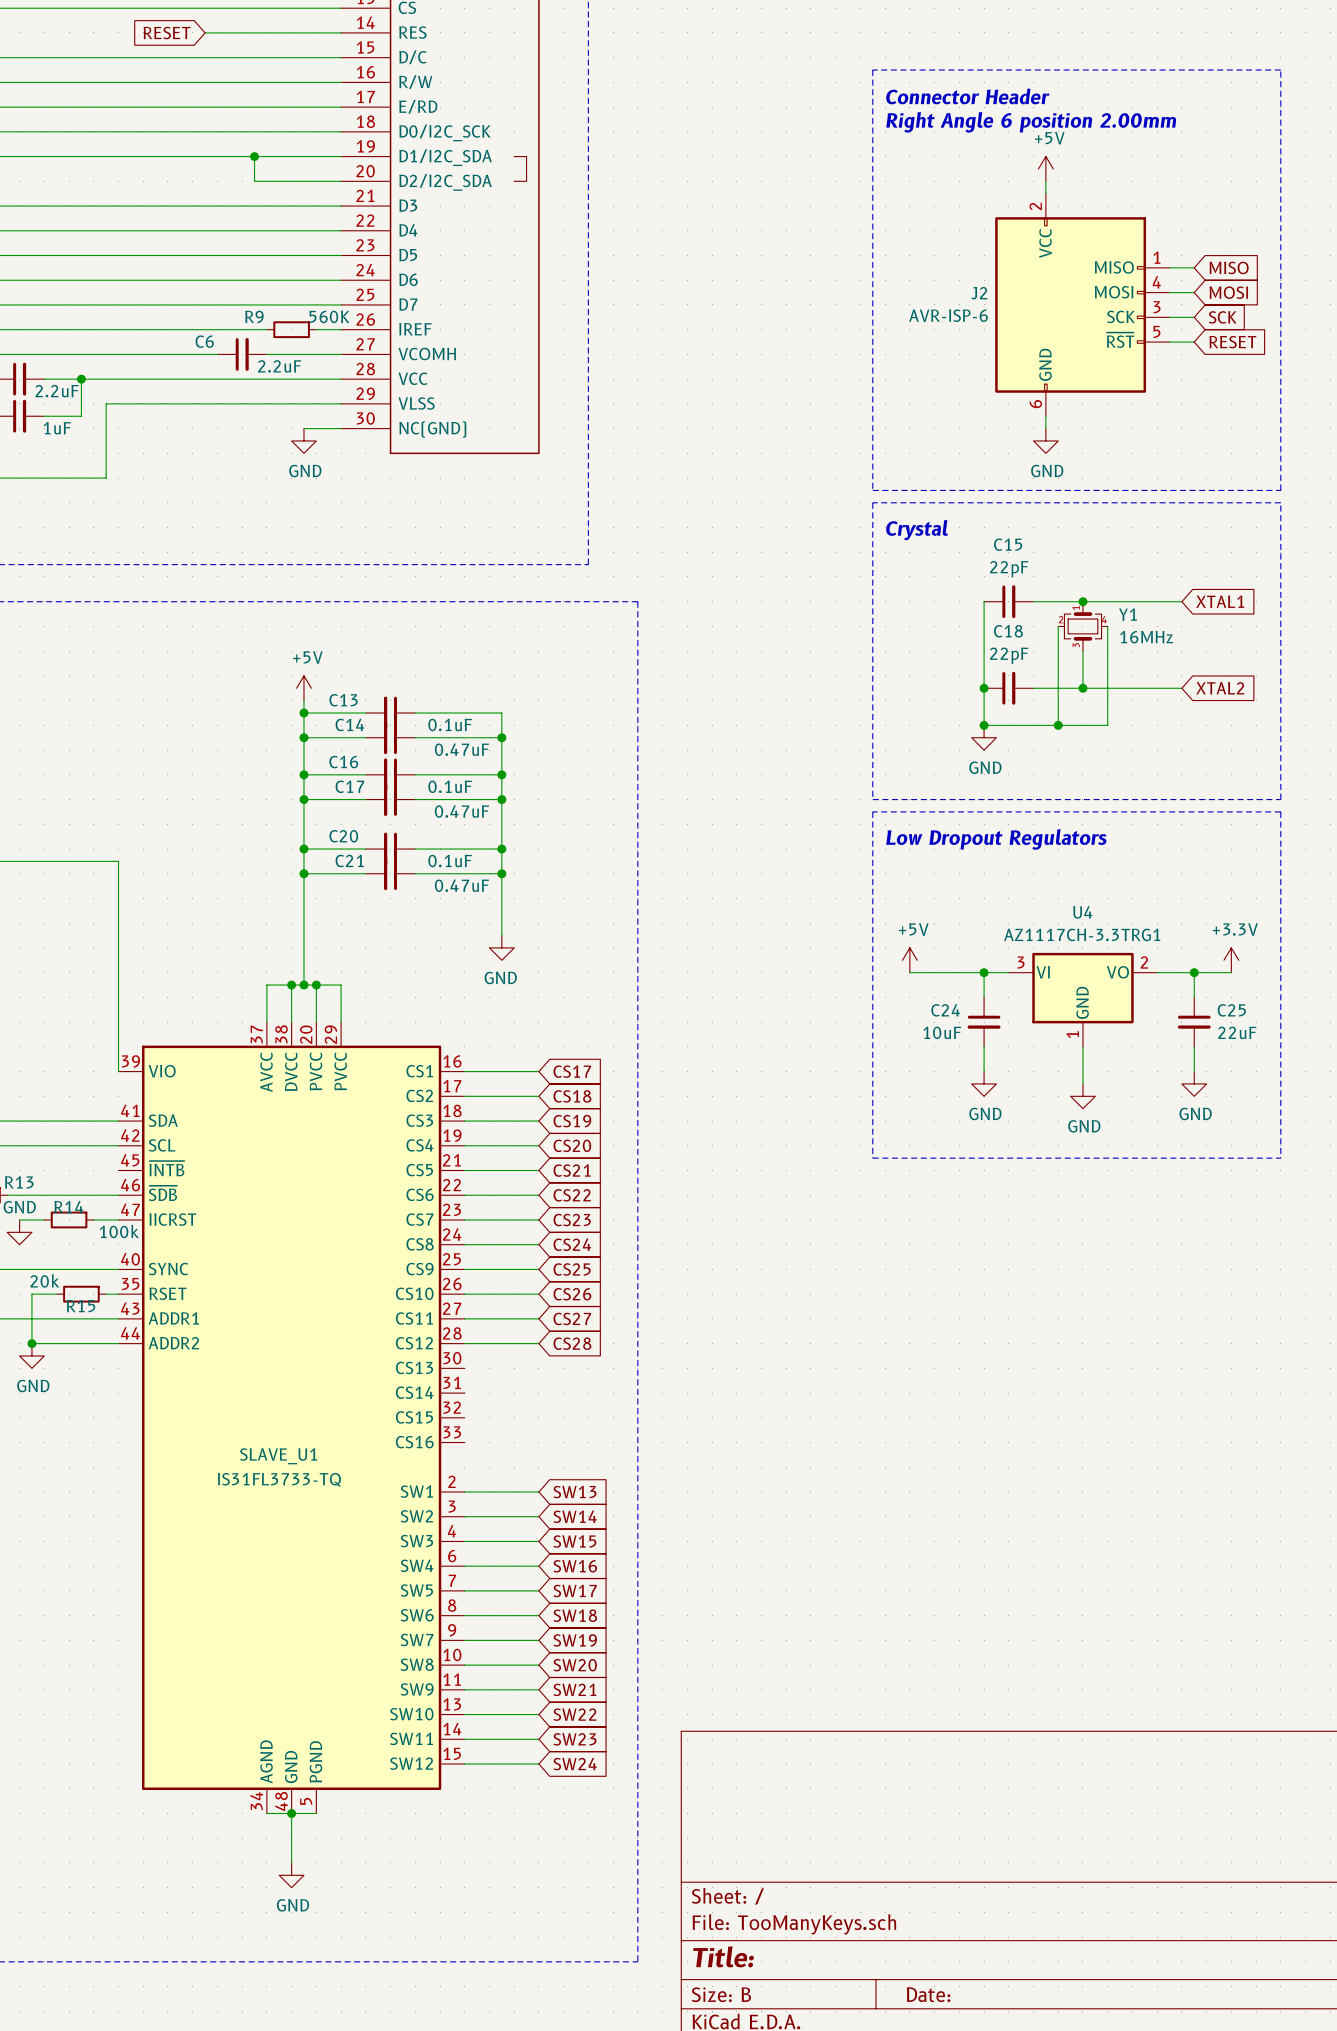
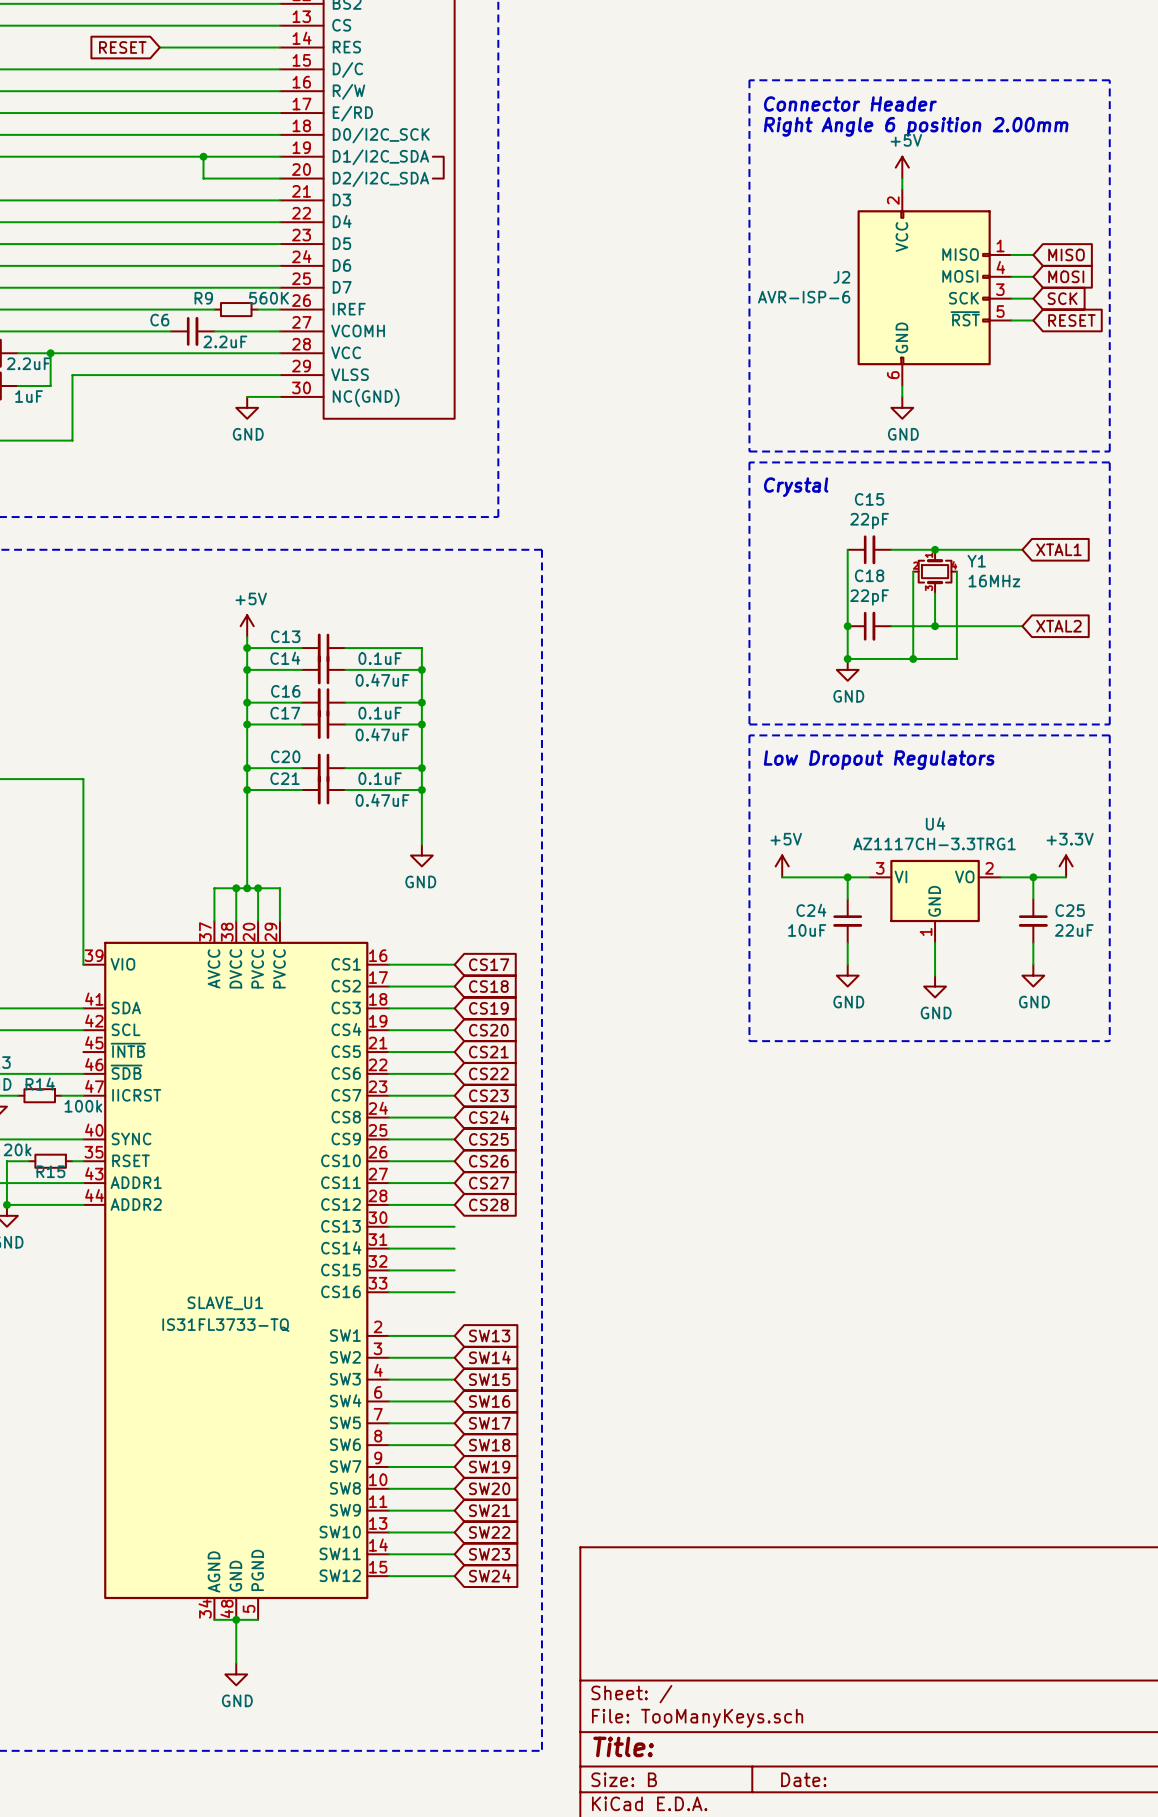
wire: none -> (389, 1226) (454, 1226)
wire: none -> (389, 1248) (454, 1248)
wire: none -> (389, 1270) (454, 1270)
wire: none -> (389, 1292) (454, 1292)

